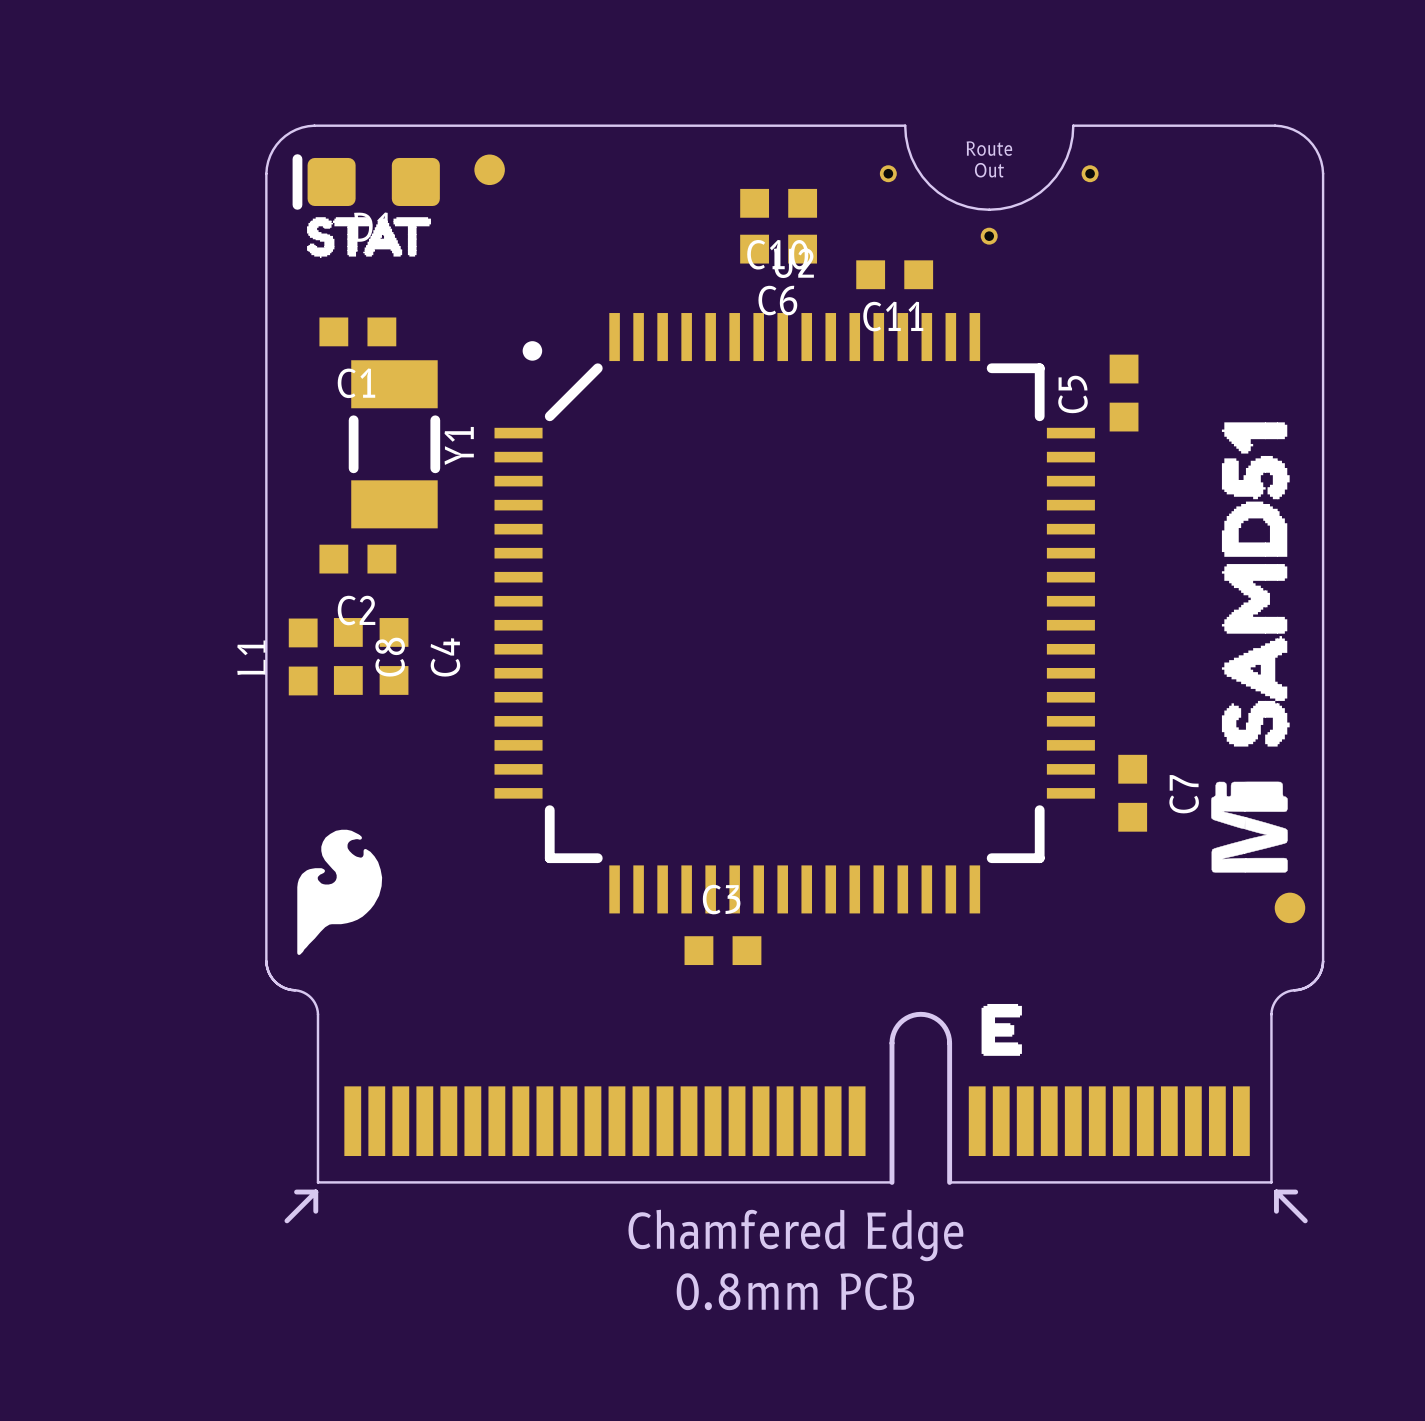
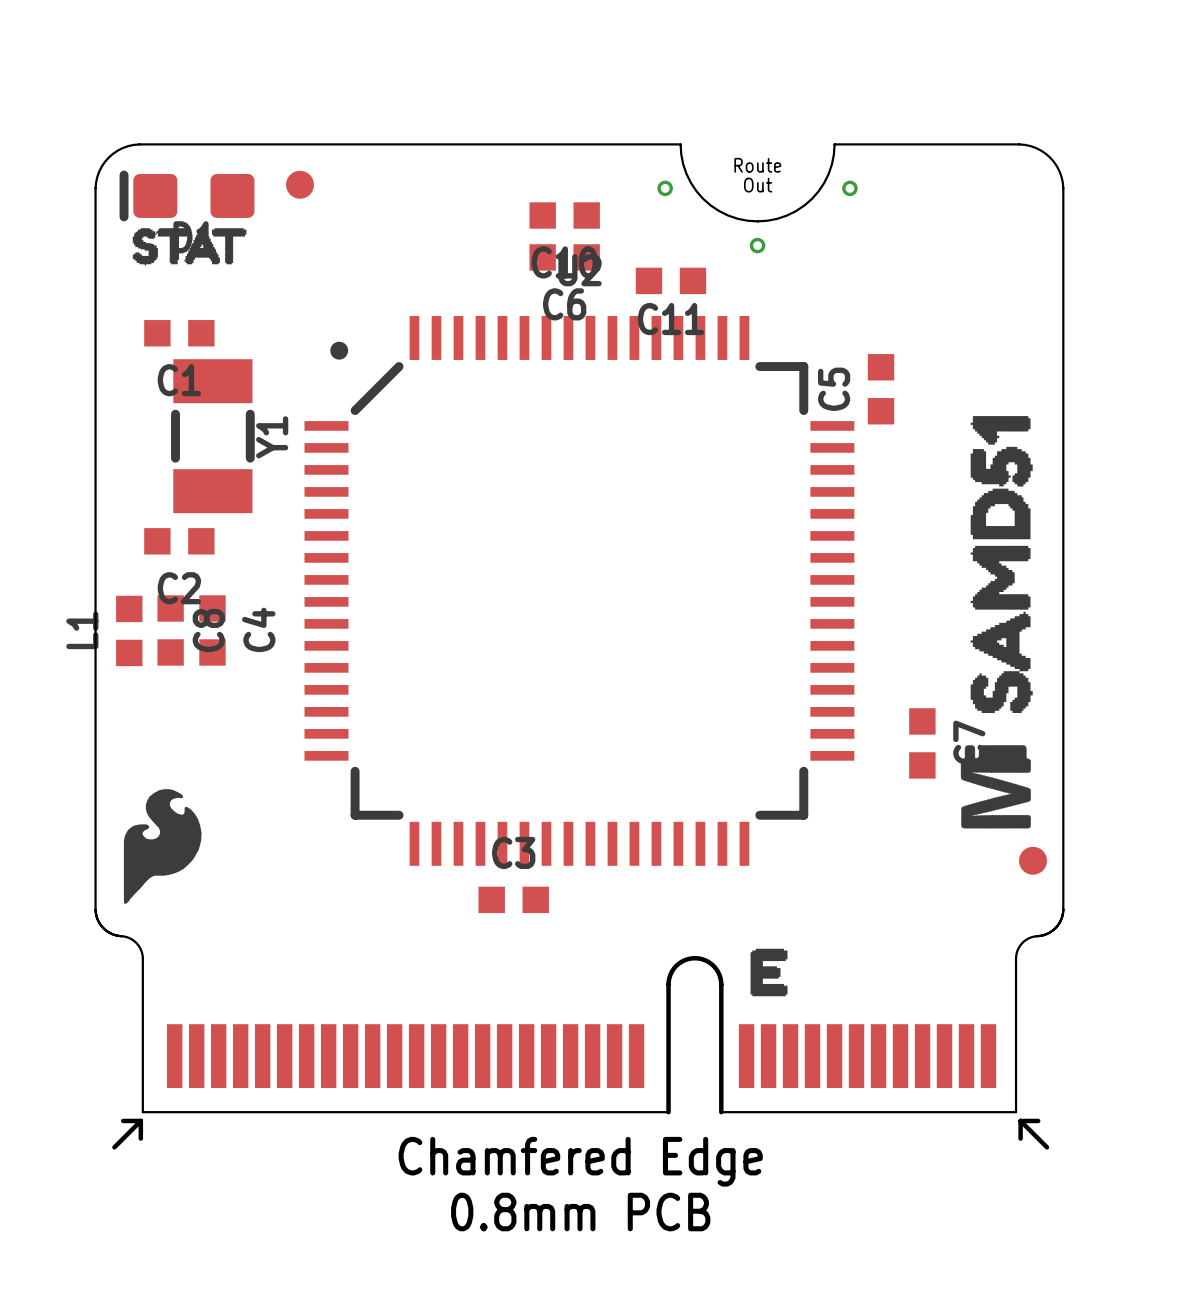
C7 position: (1132, 793) -> (922, 743)

